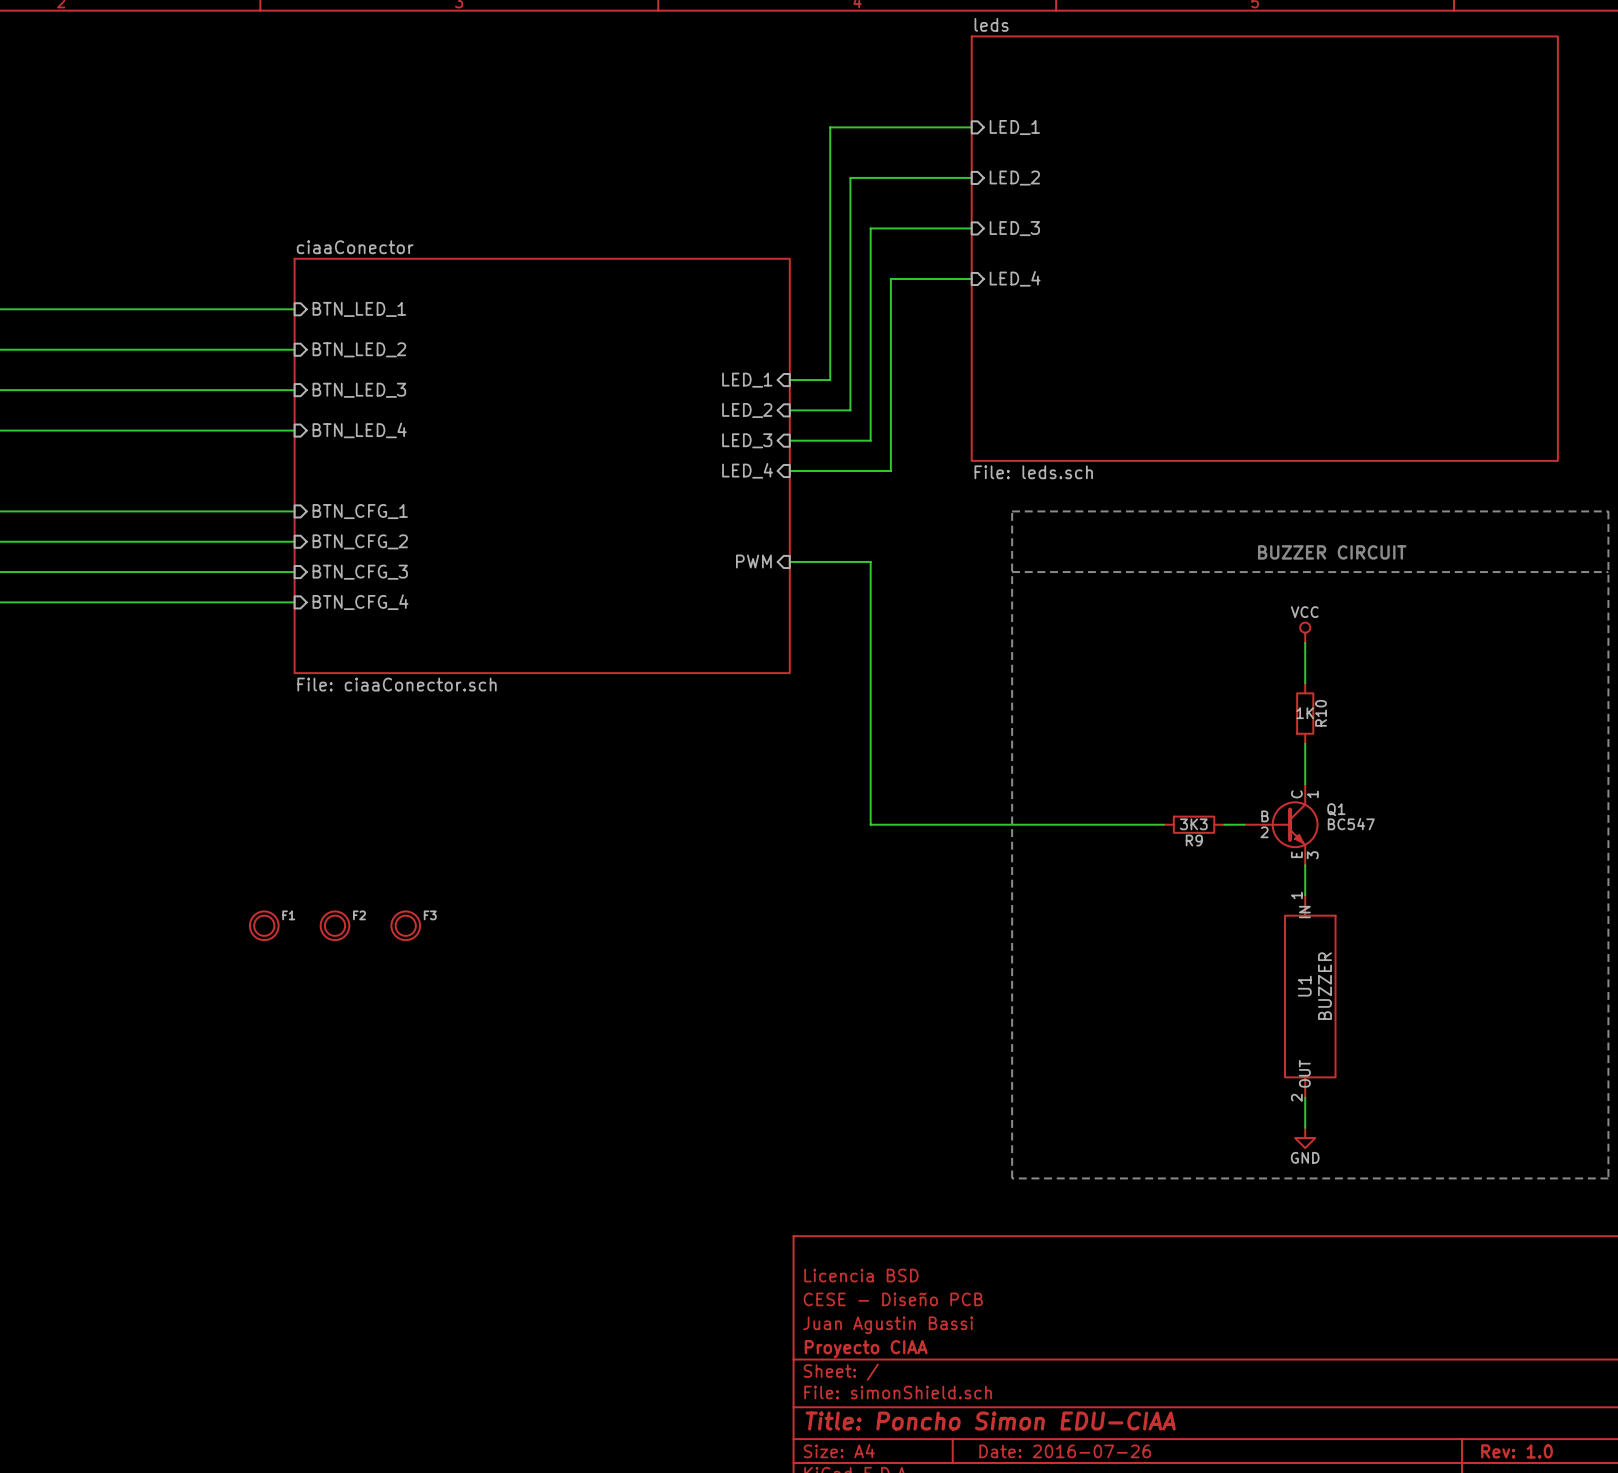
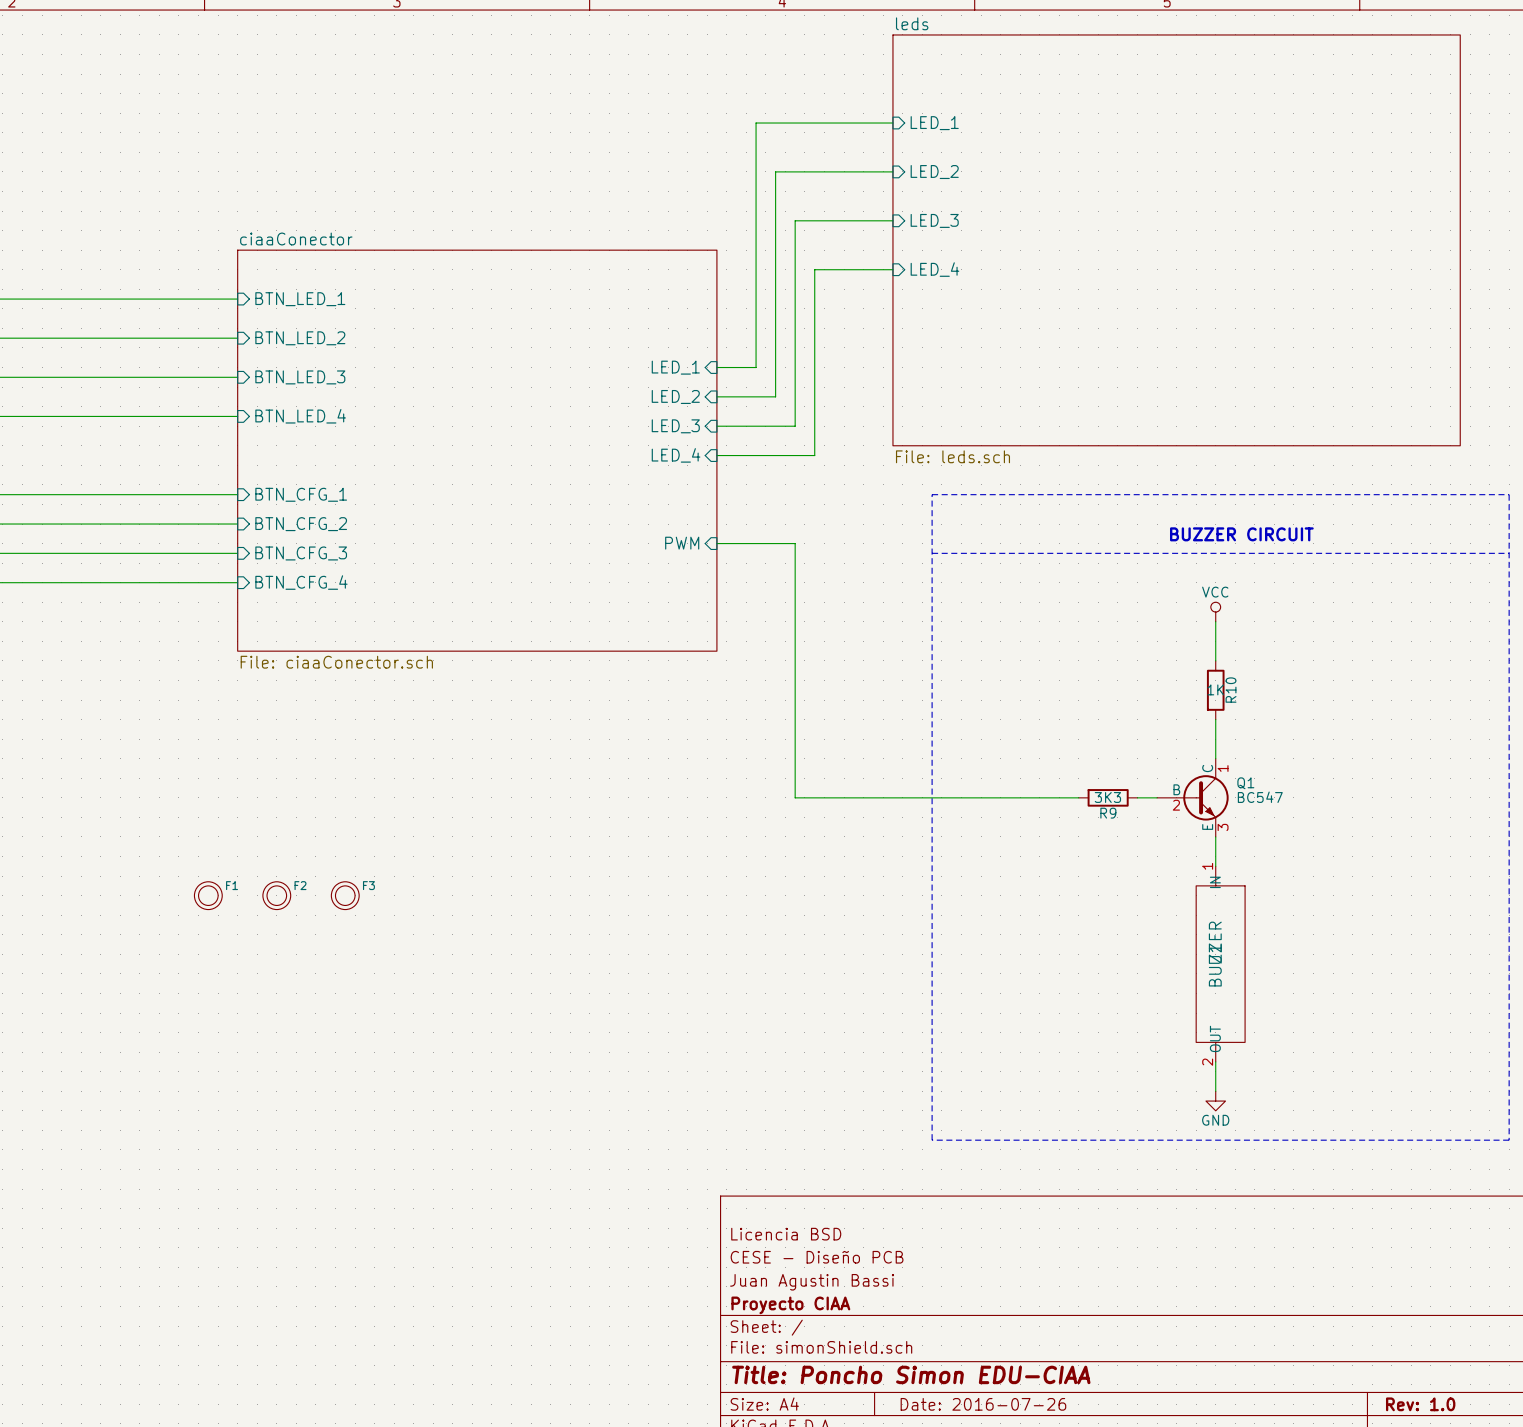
U1 value position: BUZZER (1324, 986) -> BUZZER (1215, 954)

